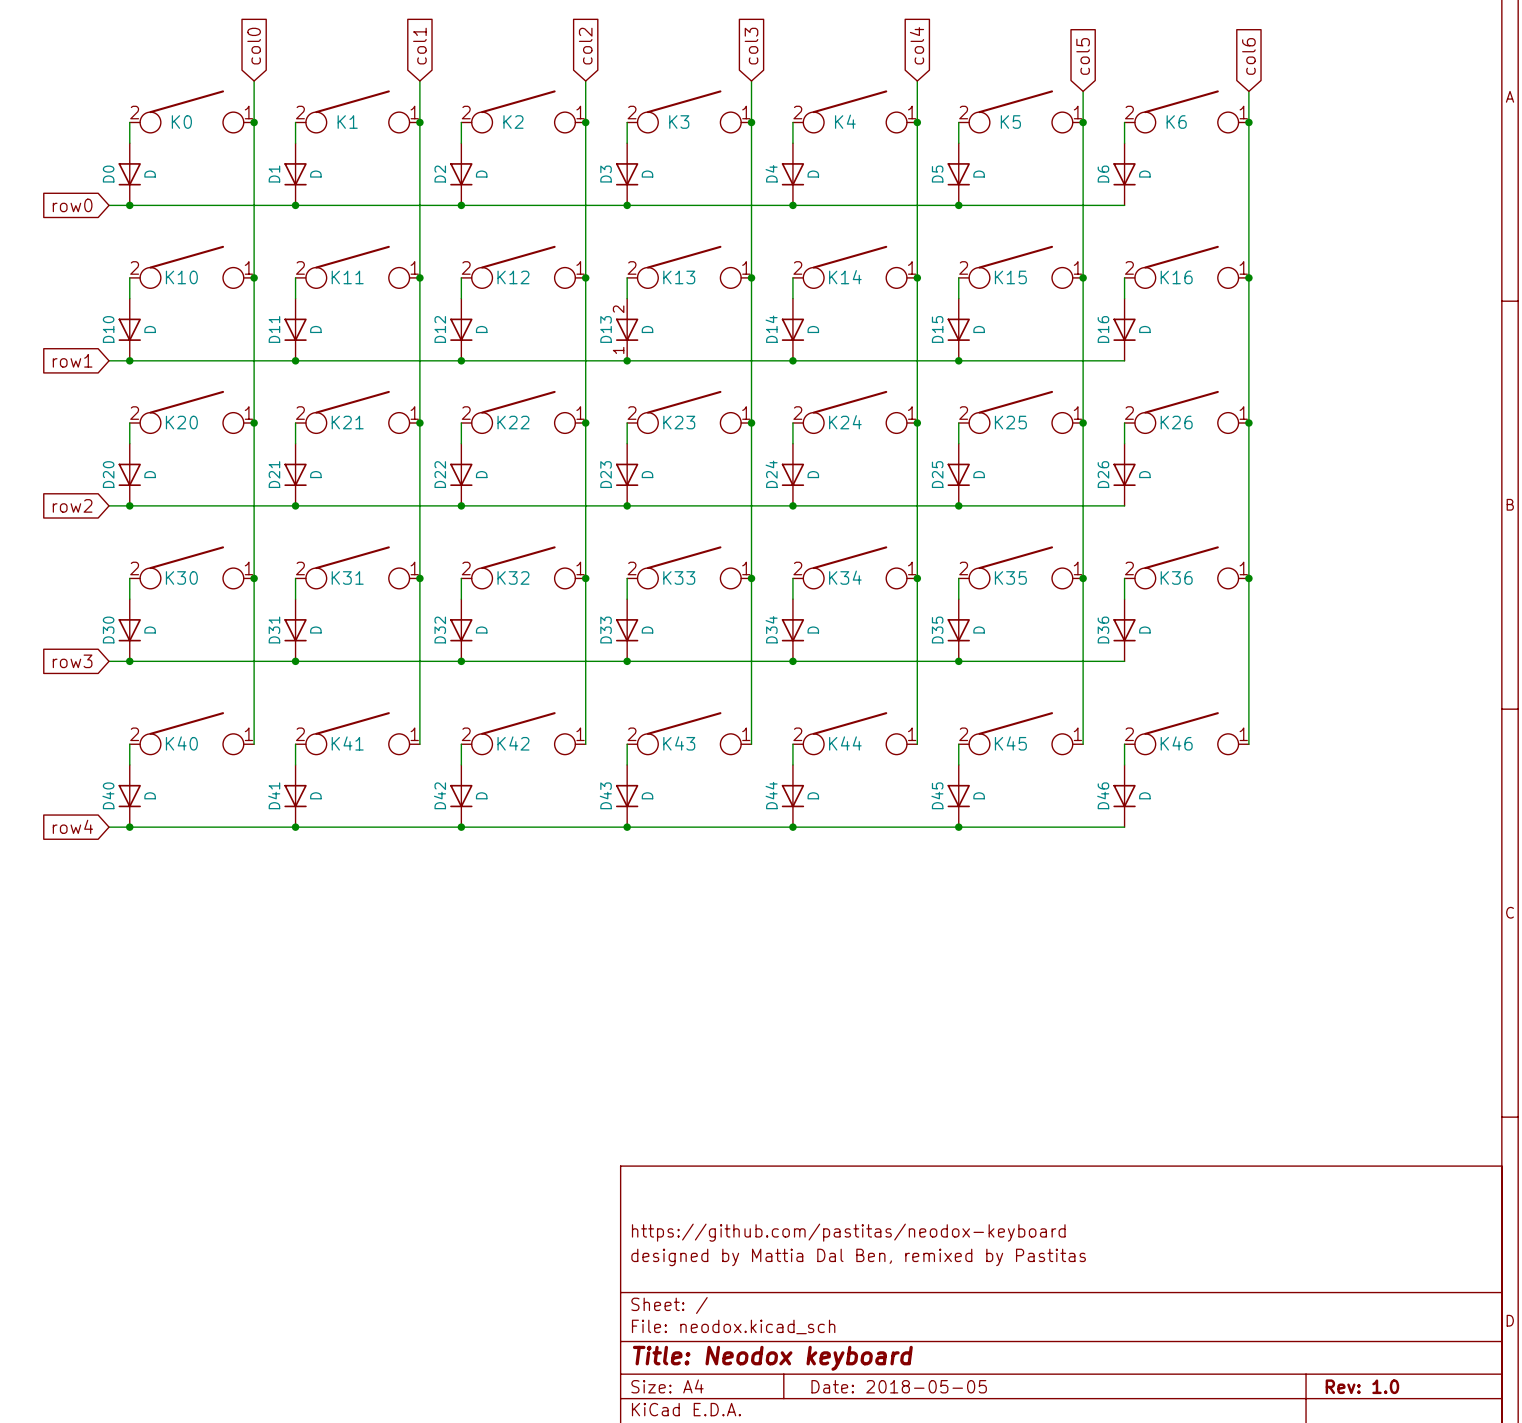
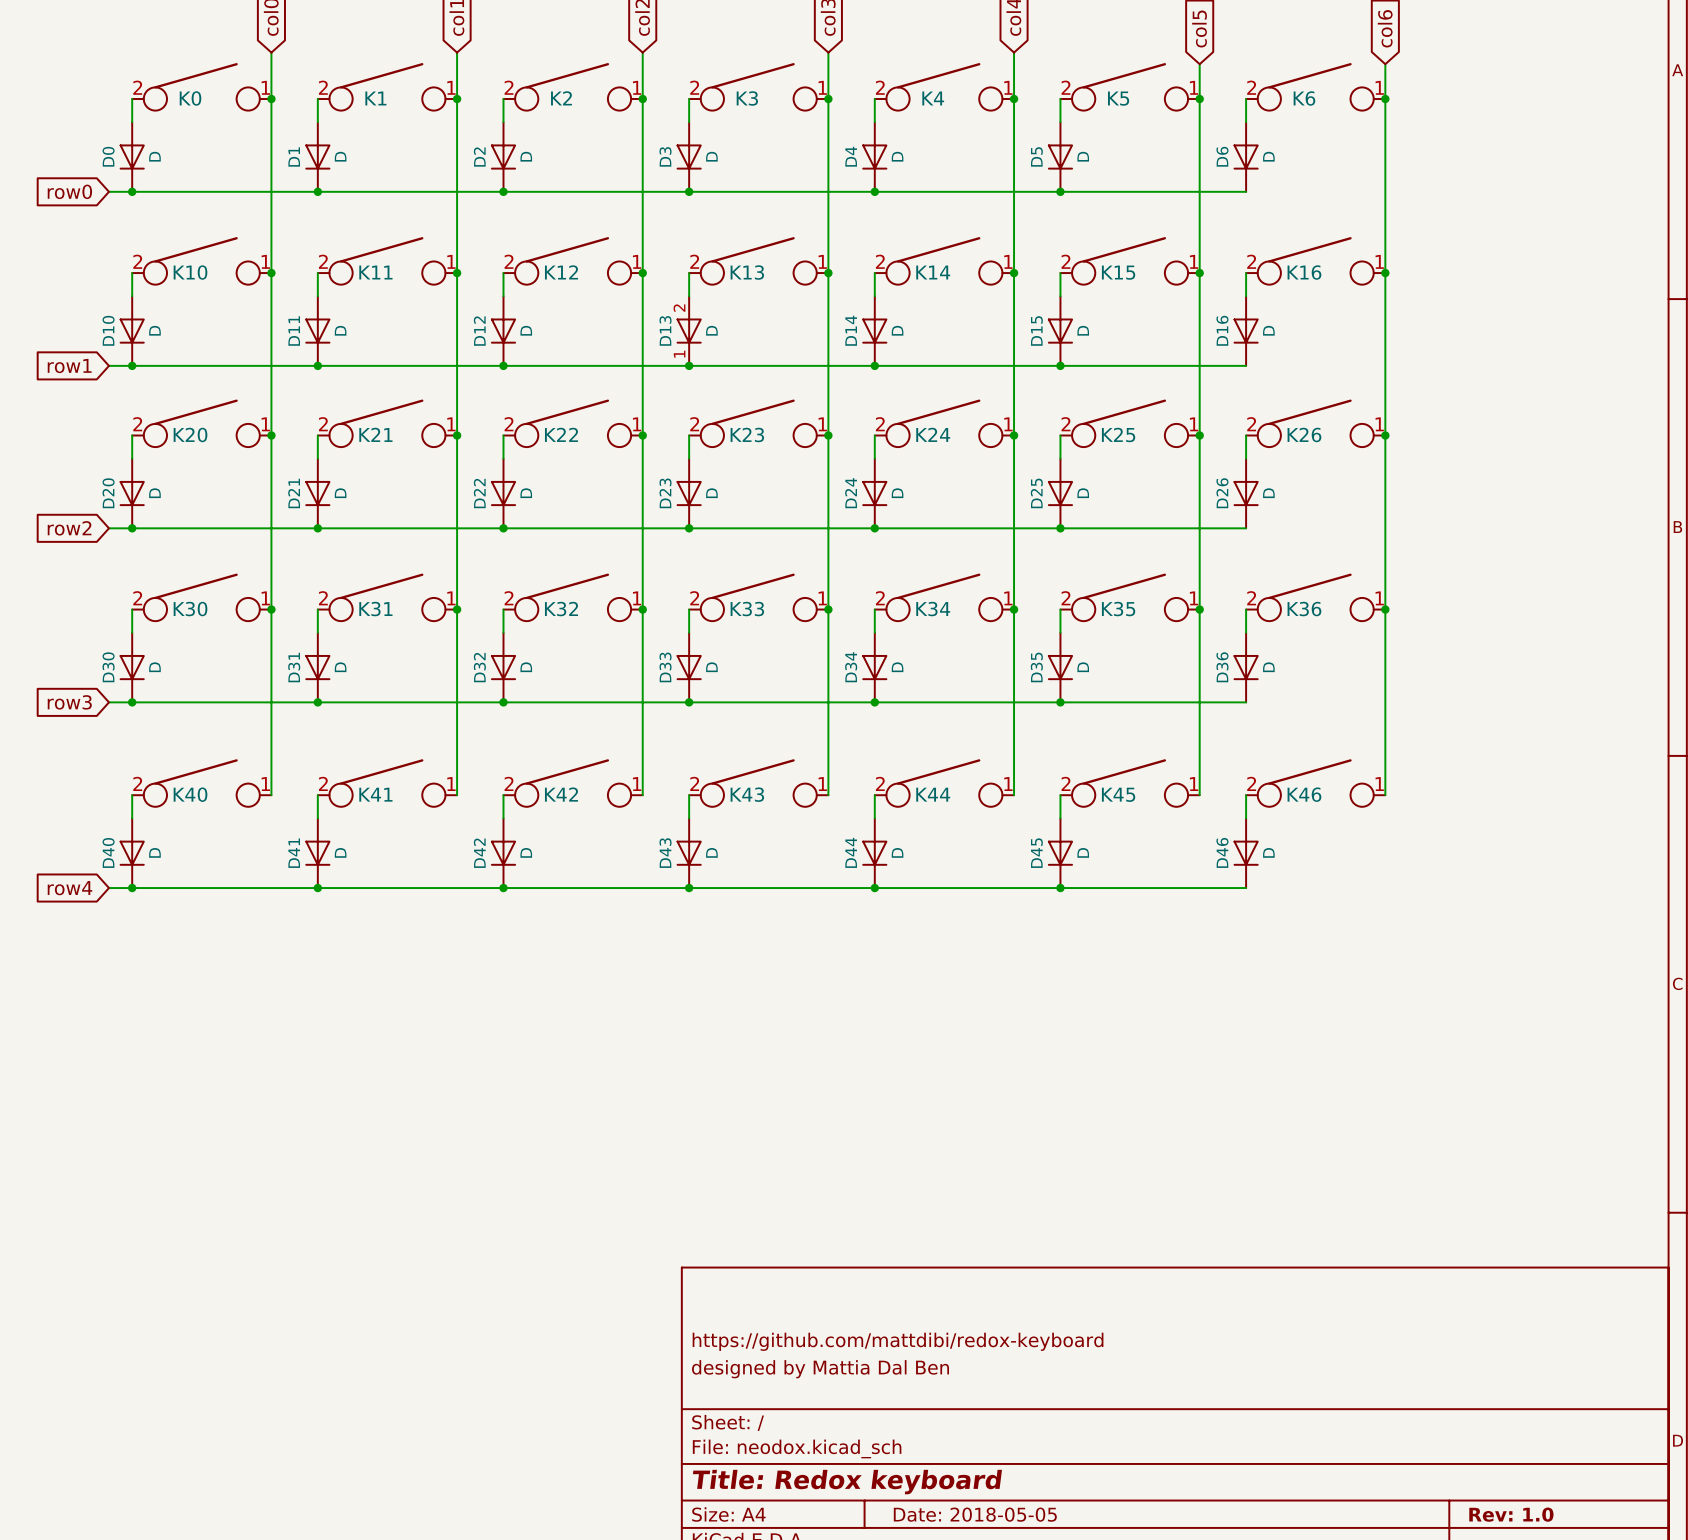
title block: https://github.com/pastitas/neodox-keyboard (848, 1232) -> https://github.com/mattdibi/redox-keyboard (898, 1341)
title block: designed by Mattia Dal Ben, remixed by Pastitas (858, 1257) -> designed by Mattia Dal Ben (820, 1369)
title block: Title: Neodox keyboard (772, 1358) -> Title: Redox keyboard (847, 1482)

